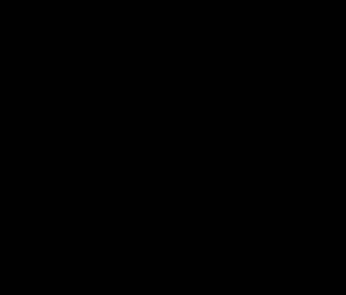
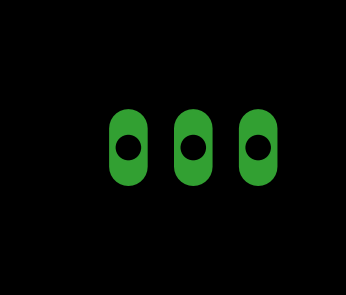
part: none -> (193, 147)

